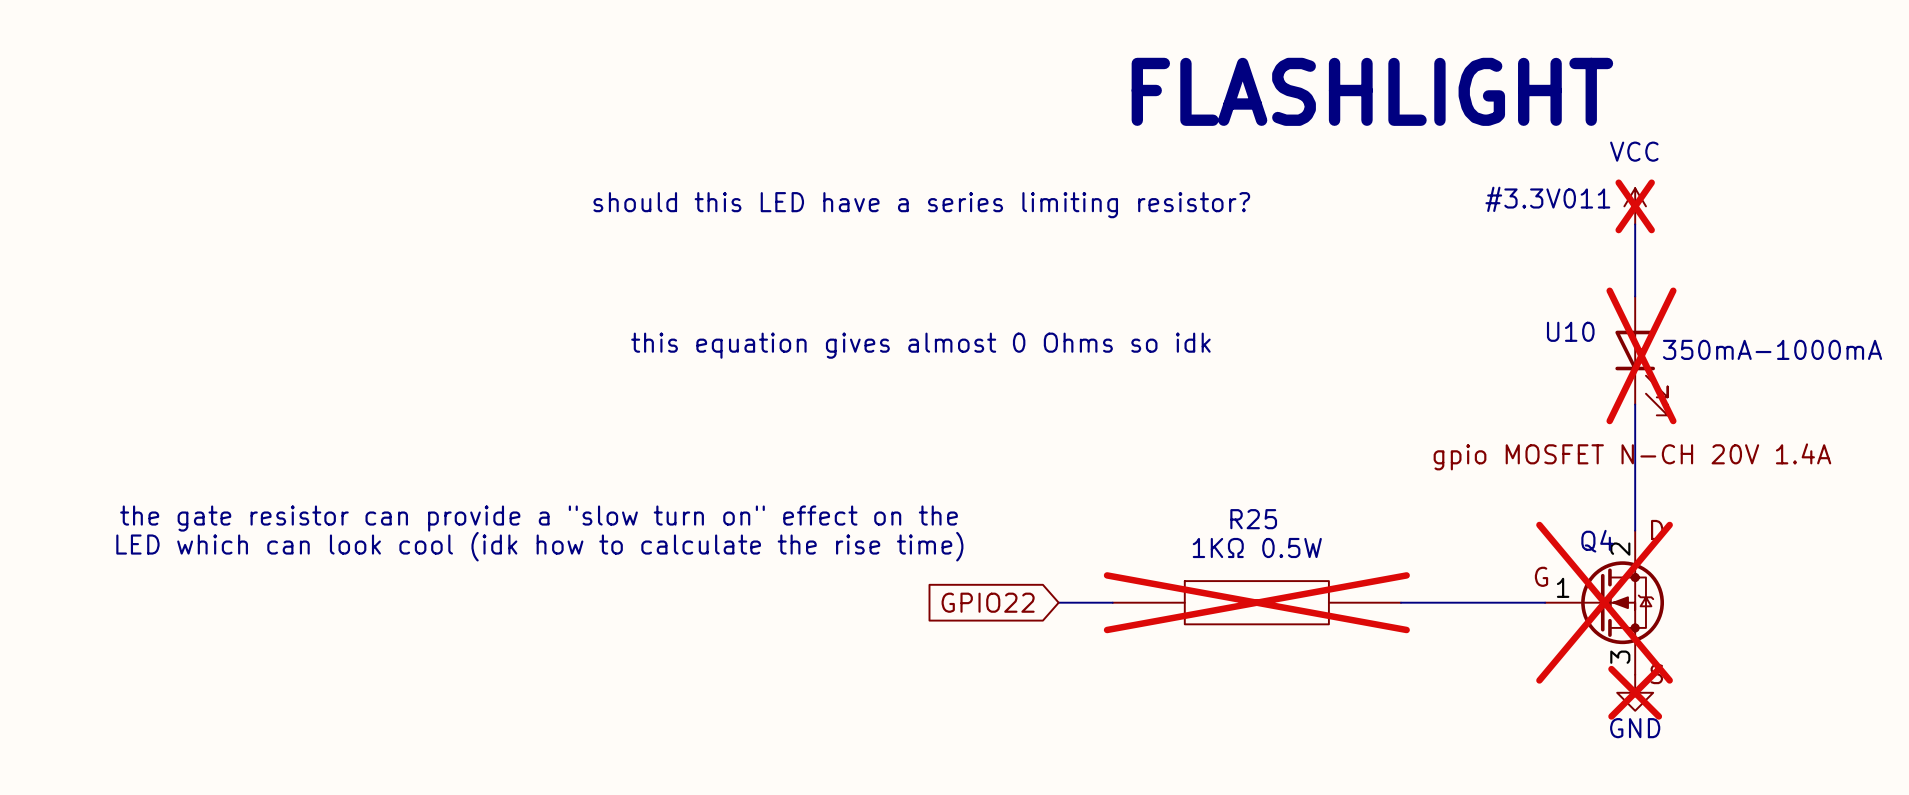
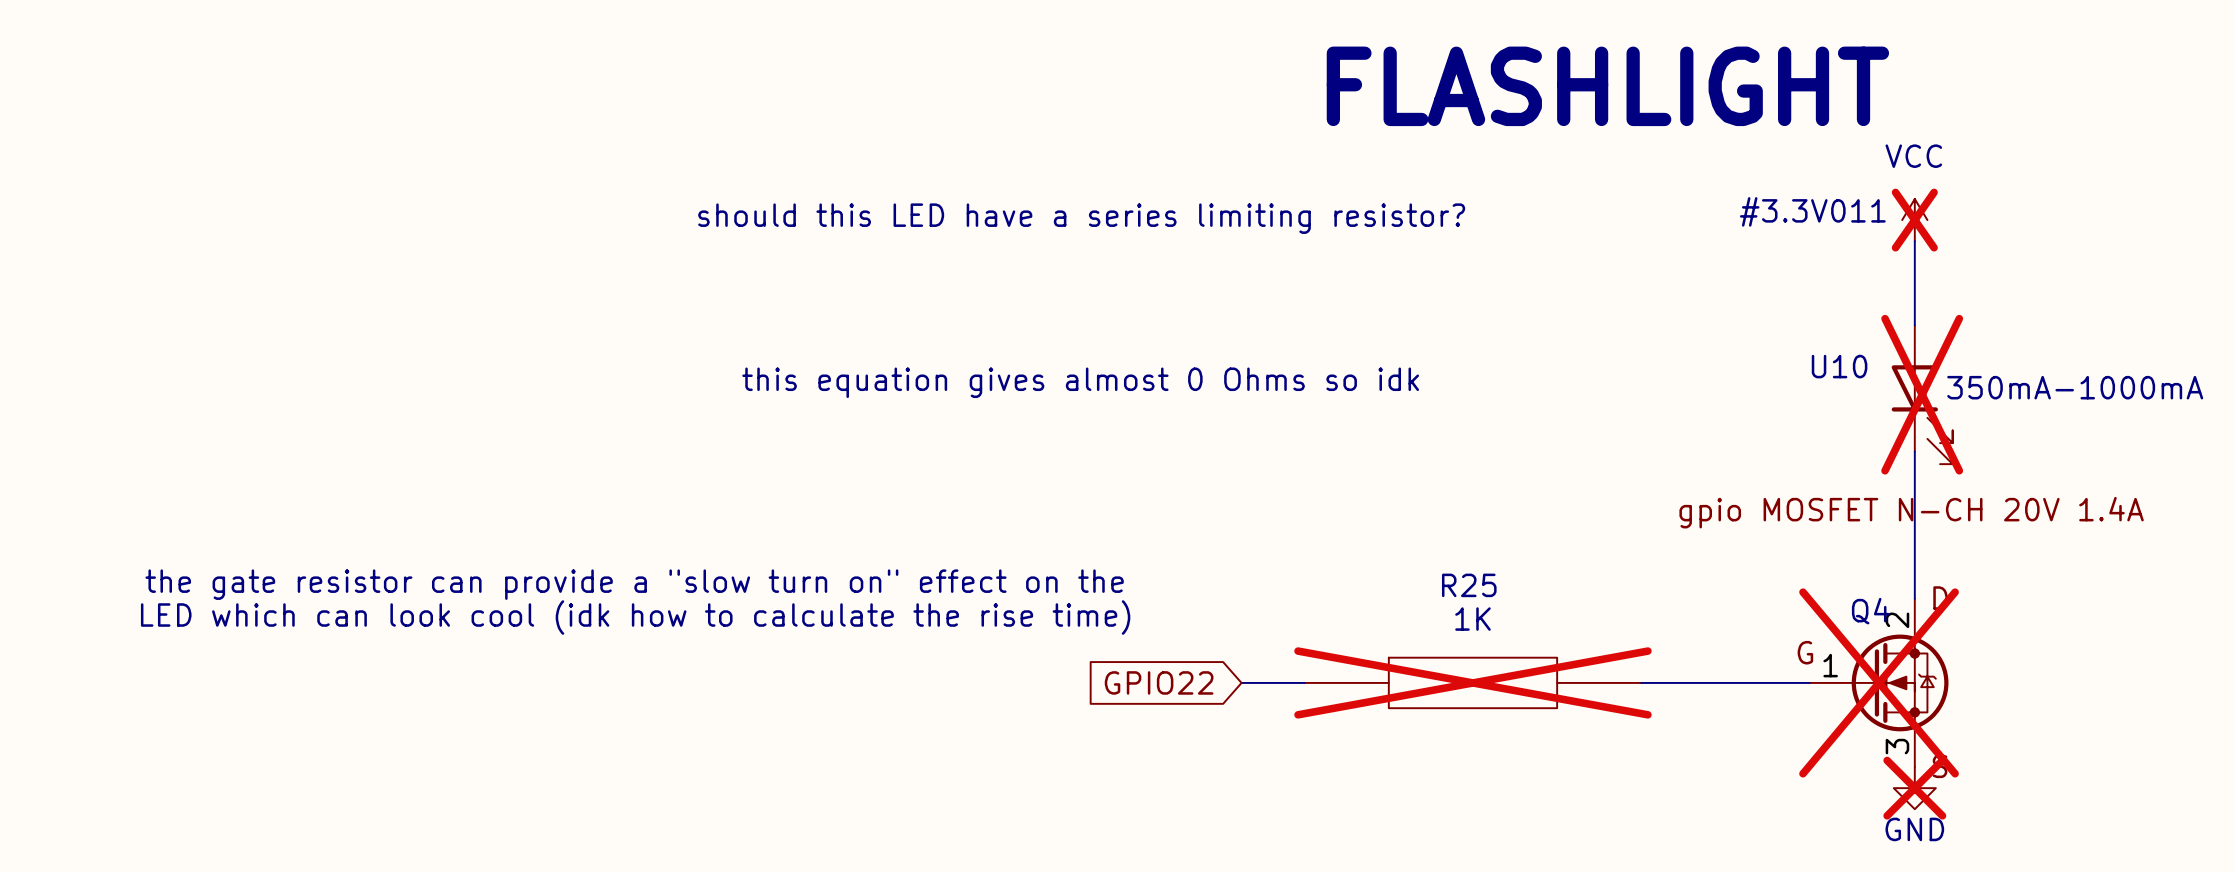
R25 value: 1KΩ 0.5W (1257, 547) -> 1K (1472, 619)

